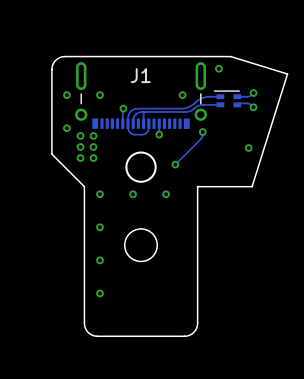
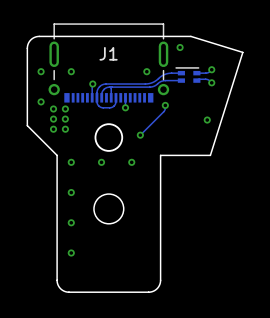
J1 footprint: [75, 62, 207, 129] -> [48, 23, 170, 103]

